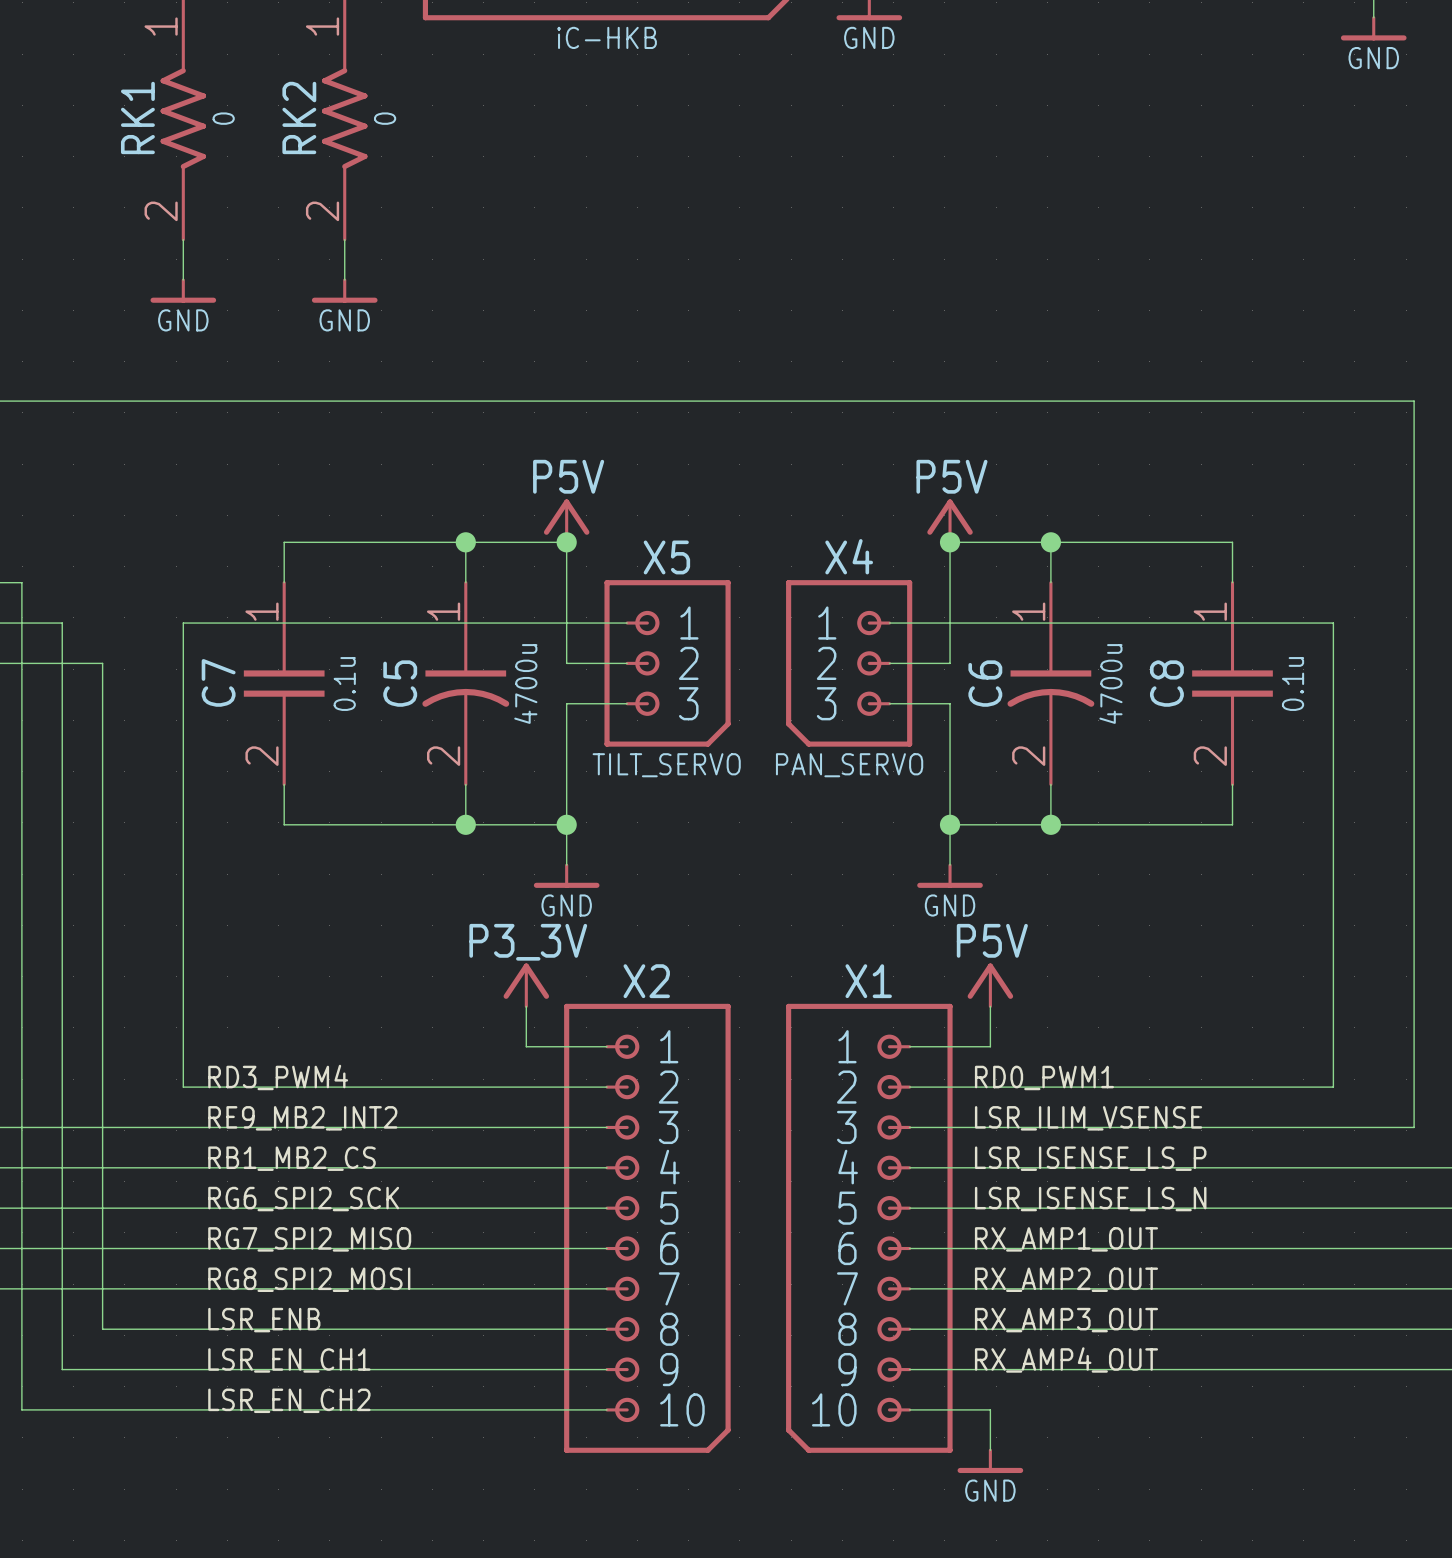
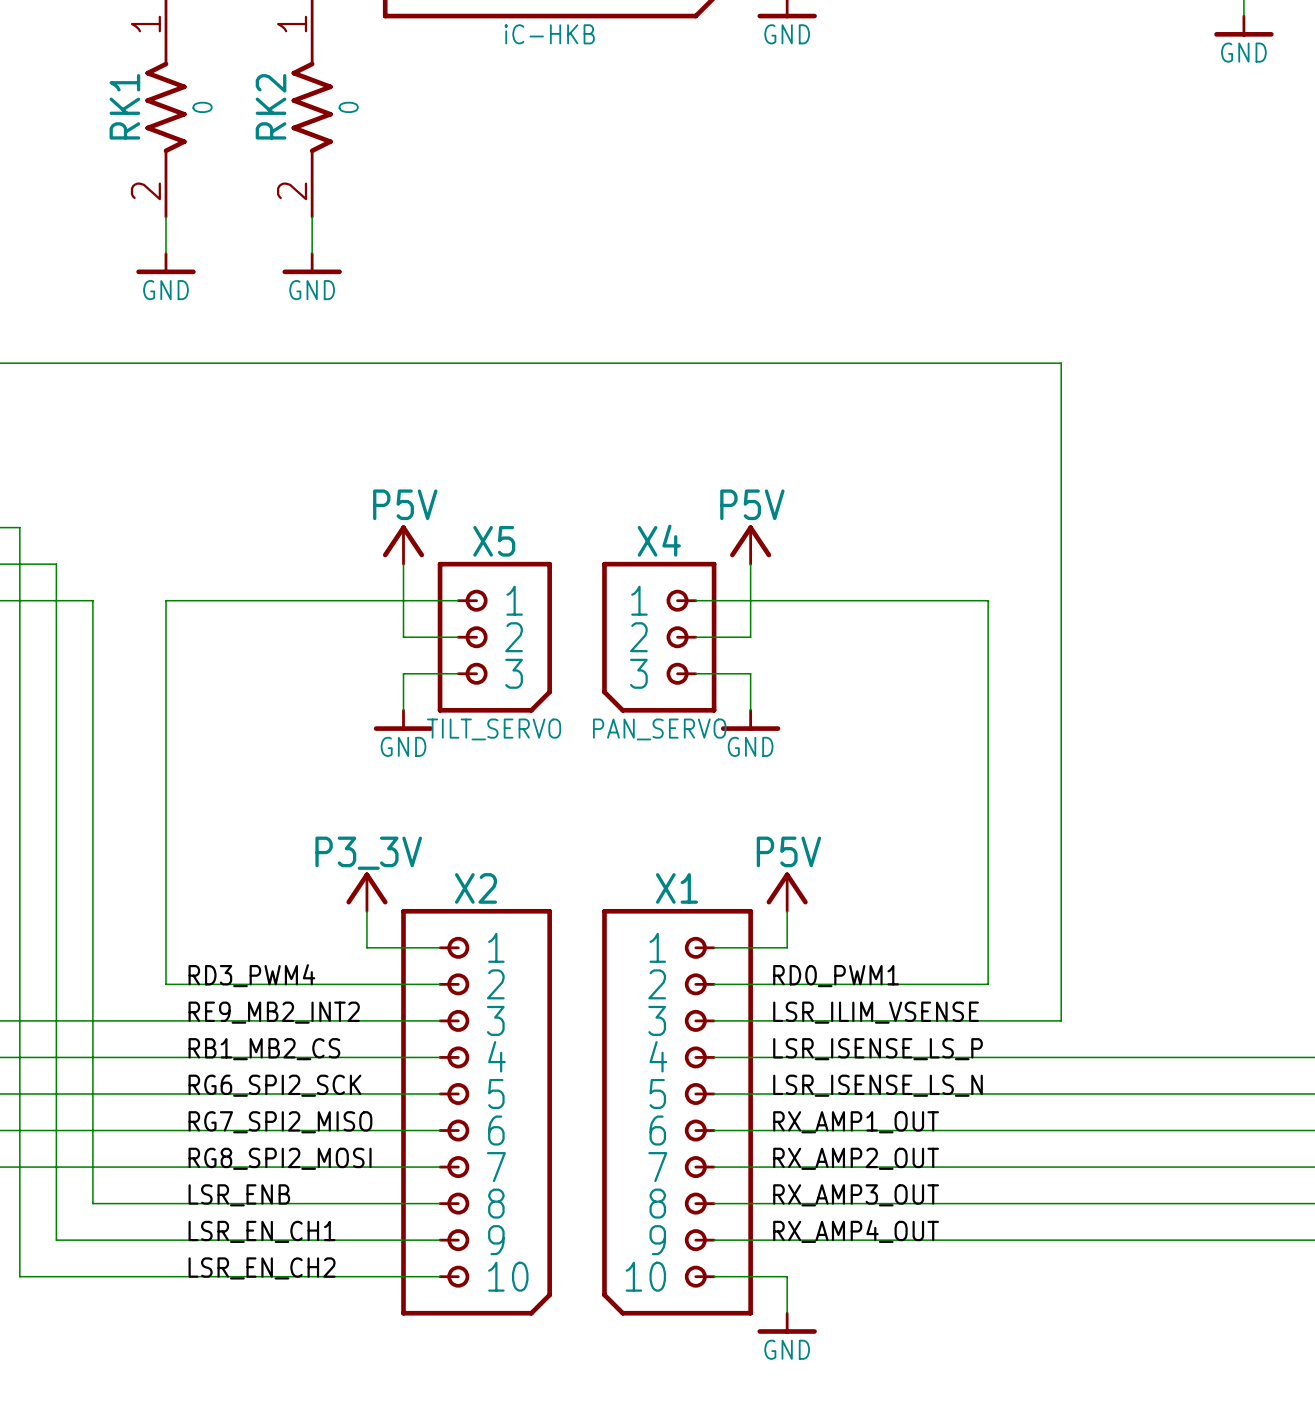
wire: (1171, 401) (1414, 401) (1414, 1127) (1171, 1127) -> (1061, 363) (1061, 1020)
power symbol: P5V (566, 521) -> none
power symbol: P5V (950, 521) -> none
wire: (465, 542) (465, 582) -> none
junction: (465, 542) -> none
junction: (566, 542) -> none
junction: (950, 542) -> none
wire: (1050, 542) (1050, 582) -> none
junction: (1050, 542) -> none
wire: (284, 582) (284, 542) (566, 542) (566, 663) (627, 663) -> none
wire: (1232, 582) (1232, 542) (950, 542) (950, 663) -> none
power symbol: none -> P5V (403, 545)
power symbol: none -> P5V (750, 545)
wire: none -> (403, 564) (403, 637) (458, 637)
wire: (627, 623) (183, 623) (183, 663) -> (458, 600) (165, 600)
wire: none -> (750, 564) (750, 637) (695, 637)
wire: (889, 623) (1333, 623) (1333, 1087) (1091, 1087) -> (860, 600) (988, 600) (988, 984)
X5 position: (667, 663) -> (494, 637)
wire: none -> (695, 600) (805, 600)
X4 position: (849, 663) -> (659, 637)
C7: 0.1u (284, 683) -> none
C5: 4700u (465, 683) -> none
C6: 4700u (1050, 683) -> none
C8: 0.1u (1232, 683) -> none
wire: (627, 703) (566, 703) (566, 865) -> none
wire: (889, 703) (950, 703) (950, 865) -> none
wire: none -> (458, 673) (403, 673) (403, 710)
wire: none -> (695, 673) (750, 673) (750, 710)
wire: (284, 784) (284, 824) (566, 824) -> none
wire: (465, 784) (465, 824) -> none
wire: (1050, 784) (1050, 824) -> none
wire: (1232, 784) (1232, 824) (950, 824) -> none
power symbol: none -> GND (403, 719)
power symbol: none -> GND (750, 719)
junction: (465, 824) -> none
junction: (566, 824) -> none
junction: (950, 824) -> none
junction: (1050, 824) -> none
power symbol: GND (566, 875) -> none
power symbol: GND (950, 875) -> none
power symbol position: P3_3V (526, 985) -> P3_3V (366, 892)
power symbol position: P5V (990, 985) -> P5V (787, 892)
wire: (526, 1006) (526, 1046) (607, 1046) -> (366, 911) (366, 947) (440, 947)
wire: (990, 1006) (990, 1046) (909, 1046) -> (787, 911) (787, 947) (714, 947)
label position: RD0_PWM1 (1044, 1077) -> RD0_PWM1 (836, 976)
wire: (485, 1087) (607, 1087) -> (714, 984) (823, 984)
label position: LSR_ILIM_VSENSE (1088, 1118) -> LSR_ILIM_VSENSE (876, 1012)
wire: (485, 1127) (607, 1127) -> (714, 1020) (823, 1020)
label position: LSR_ISENSE_LS_P (1090, 1158) -> LSR_ISENSE_LS_P (878, 1049)
wire: (485, 1167) (607, 1167) -> (714, 1057) (823, 1057)
label position: LSR_ISENSE_LS_N (1090, 1199) -> LSR_ISENSE_LS_N (878, 1085)
wire: (485, 1208) (607, 1208) -> (714, 1093) (823, 1093)
X2 position: (647, 1228) -> (476, 1112)
X1 position: (869, 1228) -> (677, 1112)
label position: RX_AMP1_OUT (1066, 1239) -> RX_AMP1_OUT (856, 1122)
wire: (485, 1248) (607, 1248) -> (714, 1130) (823, 1130)
label position: RX_AMP2_OUT (1066, 1279) -> RX_AMP2_OUT (856, 1158)
wire: (485, 1288) (607, 1288) -> (714, 1167) (823, 1167)
label position: RX_AMP3_OUT (1066, 1320) -> RX_AMP3_OUT (856, 1195)
wire: (485, 1329) (607, 1329) -> (714, 1203) (823, 1203)
label position: RX_AMP4_OUT (1066, 1359) -> RX_AMP4_OUT (856, 1231)
wire: (485, 1369) (607, 1369) -> (714, 1240) (823, 1240)
wire: (485, 1409) (607, 1409) -> none
wire: (909, 1409) (990, 1409) (990, 1450) -> (714, 1276) (787, 1276) (787, 1313)
power symbol position: GND (990, 1460) -> GND (787, 1322)

